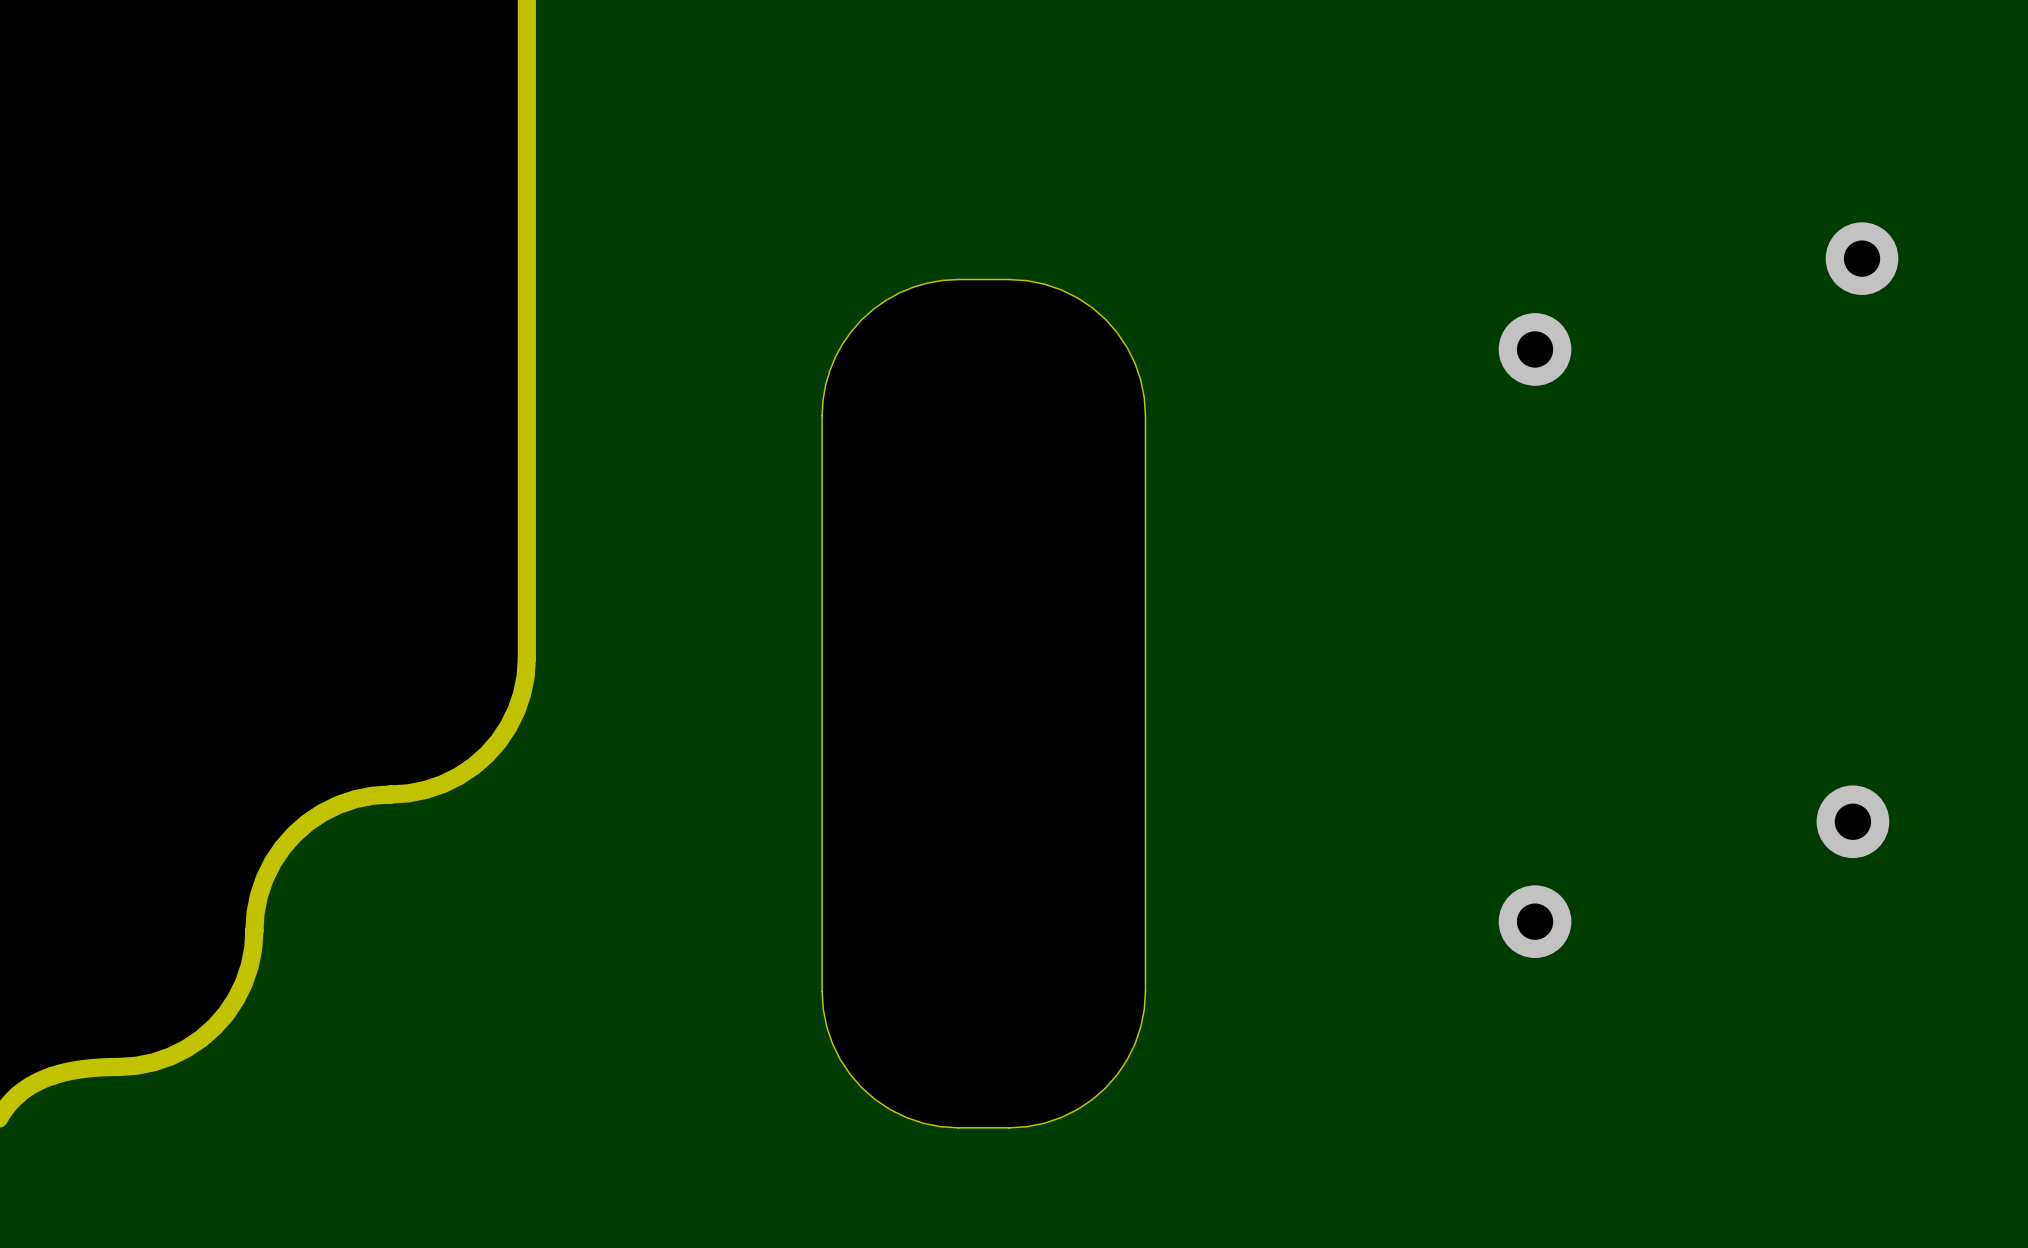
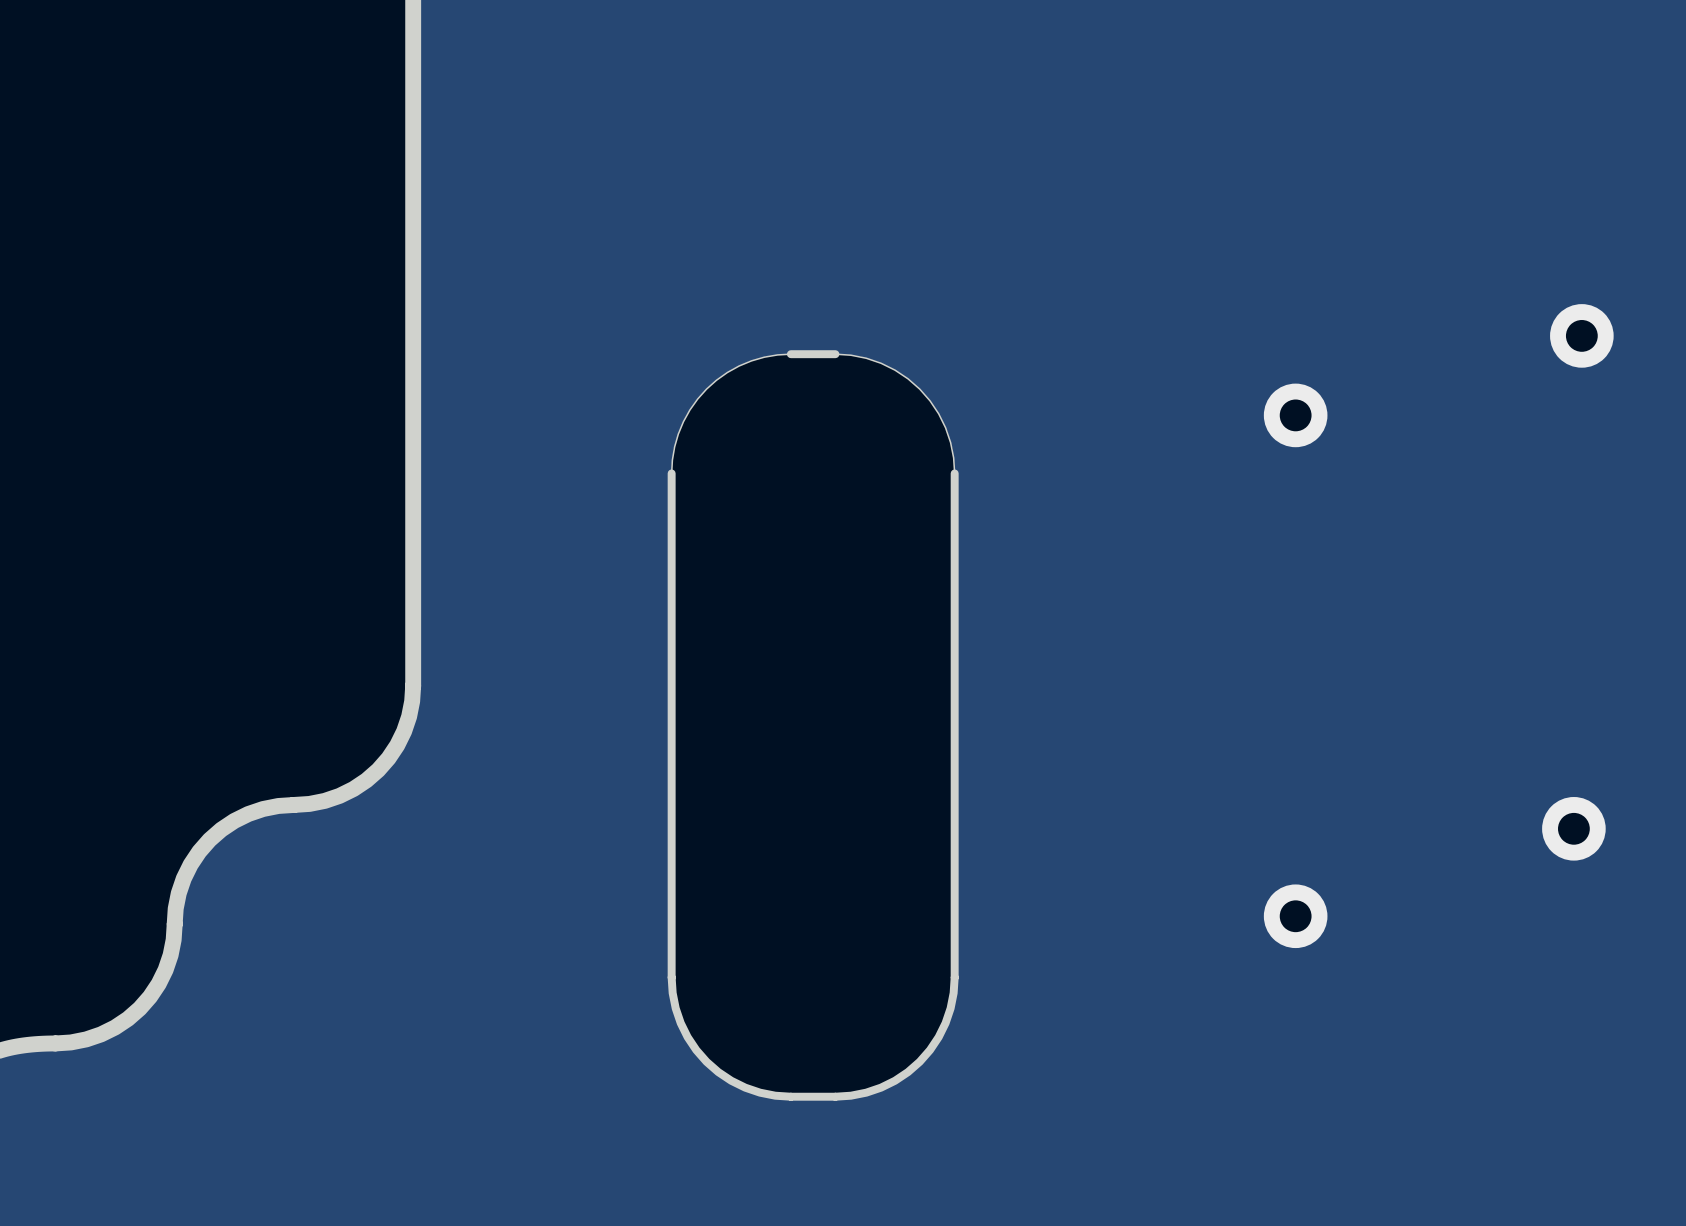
board edge width: thin (1009, 279) (958, 279) -> thick (835, 354) (790, 354)
board edge width: thin (1145, 415) (1144, 1009) (1135, 1043) (1117, 1074) (1105, 1087) (1092, 1099) (1061, 1117) (1044, 1123) (1009, 1127) (940, 1126) (923, 1123) (890, 1109) (862, 1087) (850, 1074) (840, 1059) (826, 1026) (822, 991) (822, 415) -> thick (954, 473) (953, 993) (945, 1023) (930, 1050) (919, 1061) (908, 1072) (881, 1087) (866, 1092) (835, 1096) (775, 1095) (760, 1092) (731, 1080) (706, 1061) (696, 1050) (687, 1037) (675, 1008) (671, 977) (671, 473)

